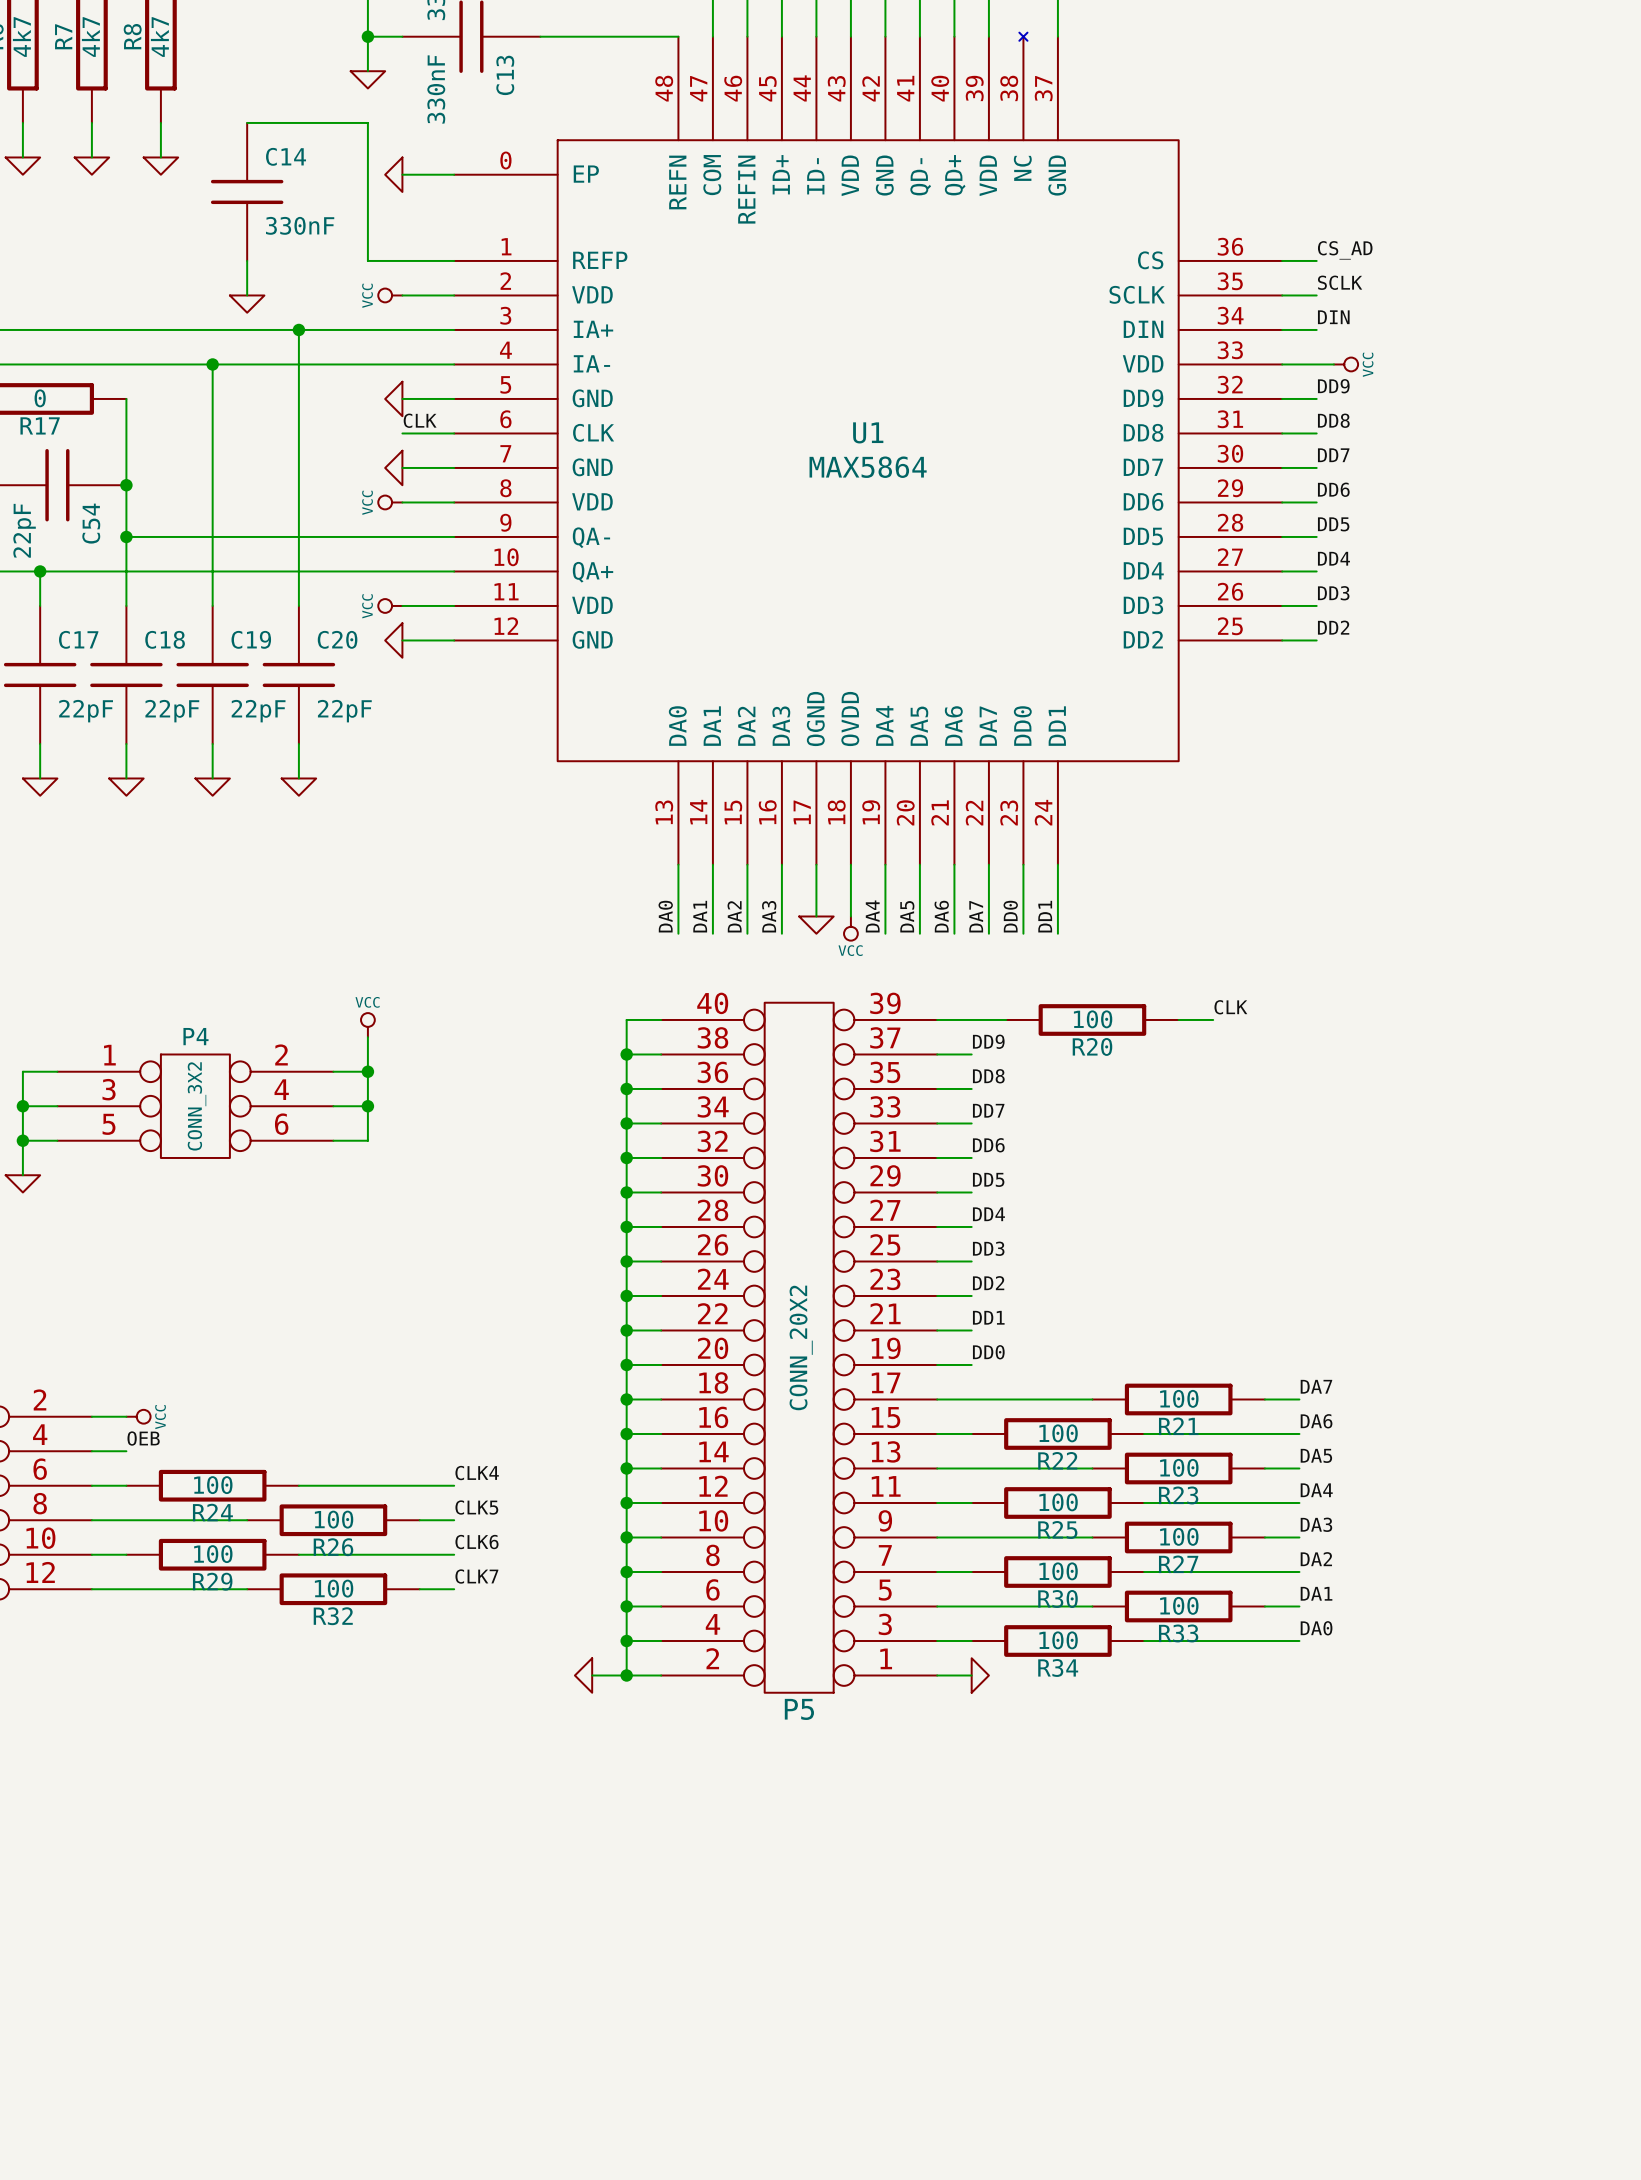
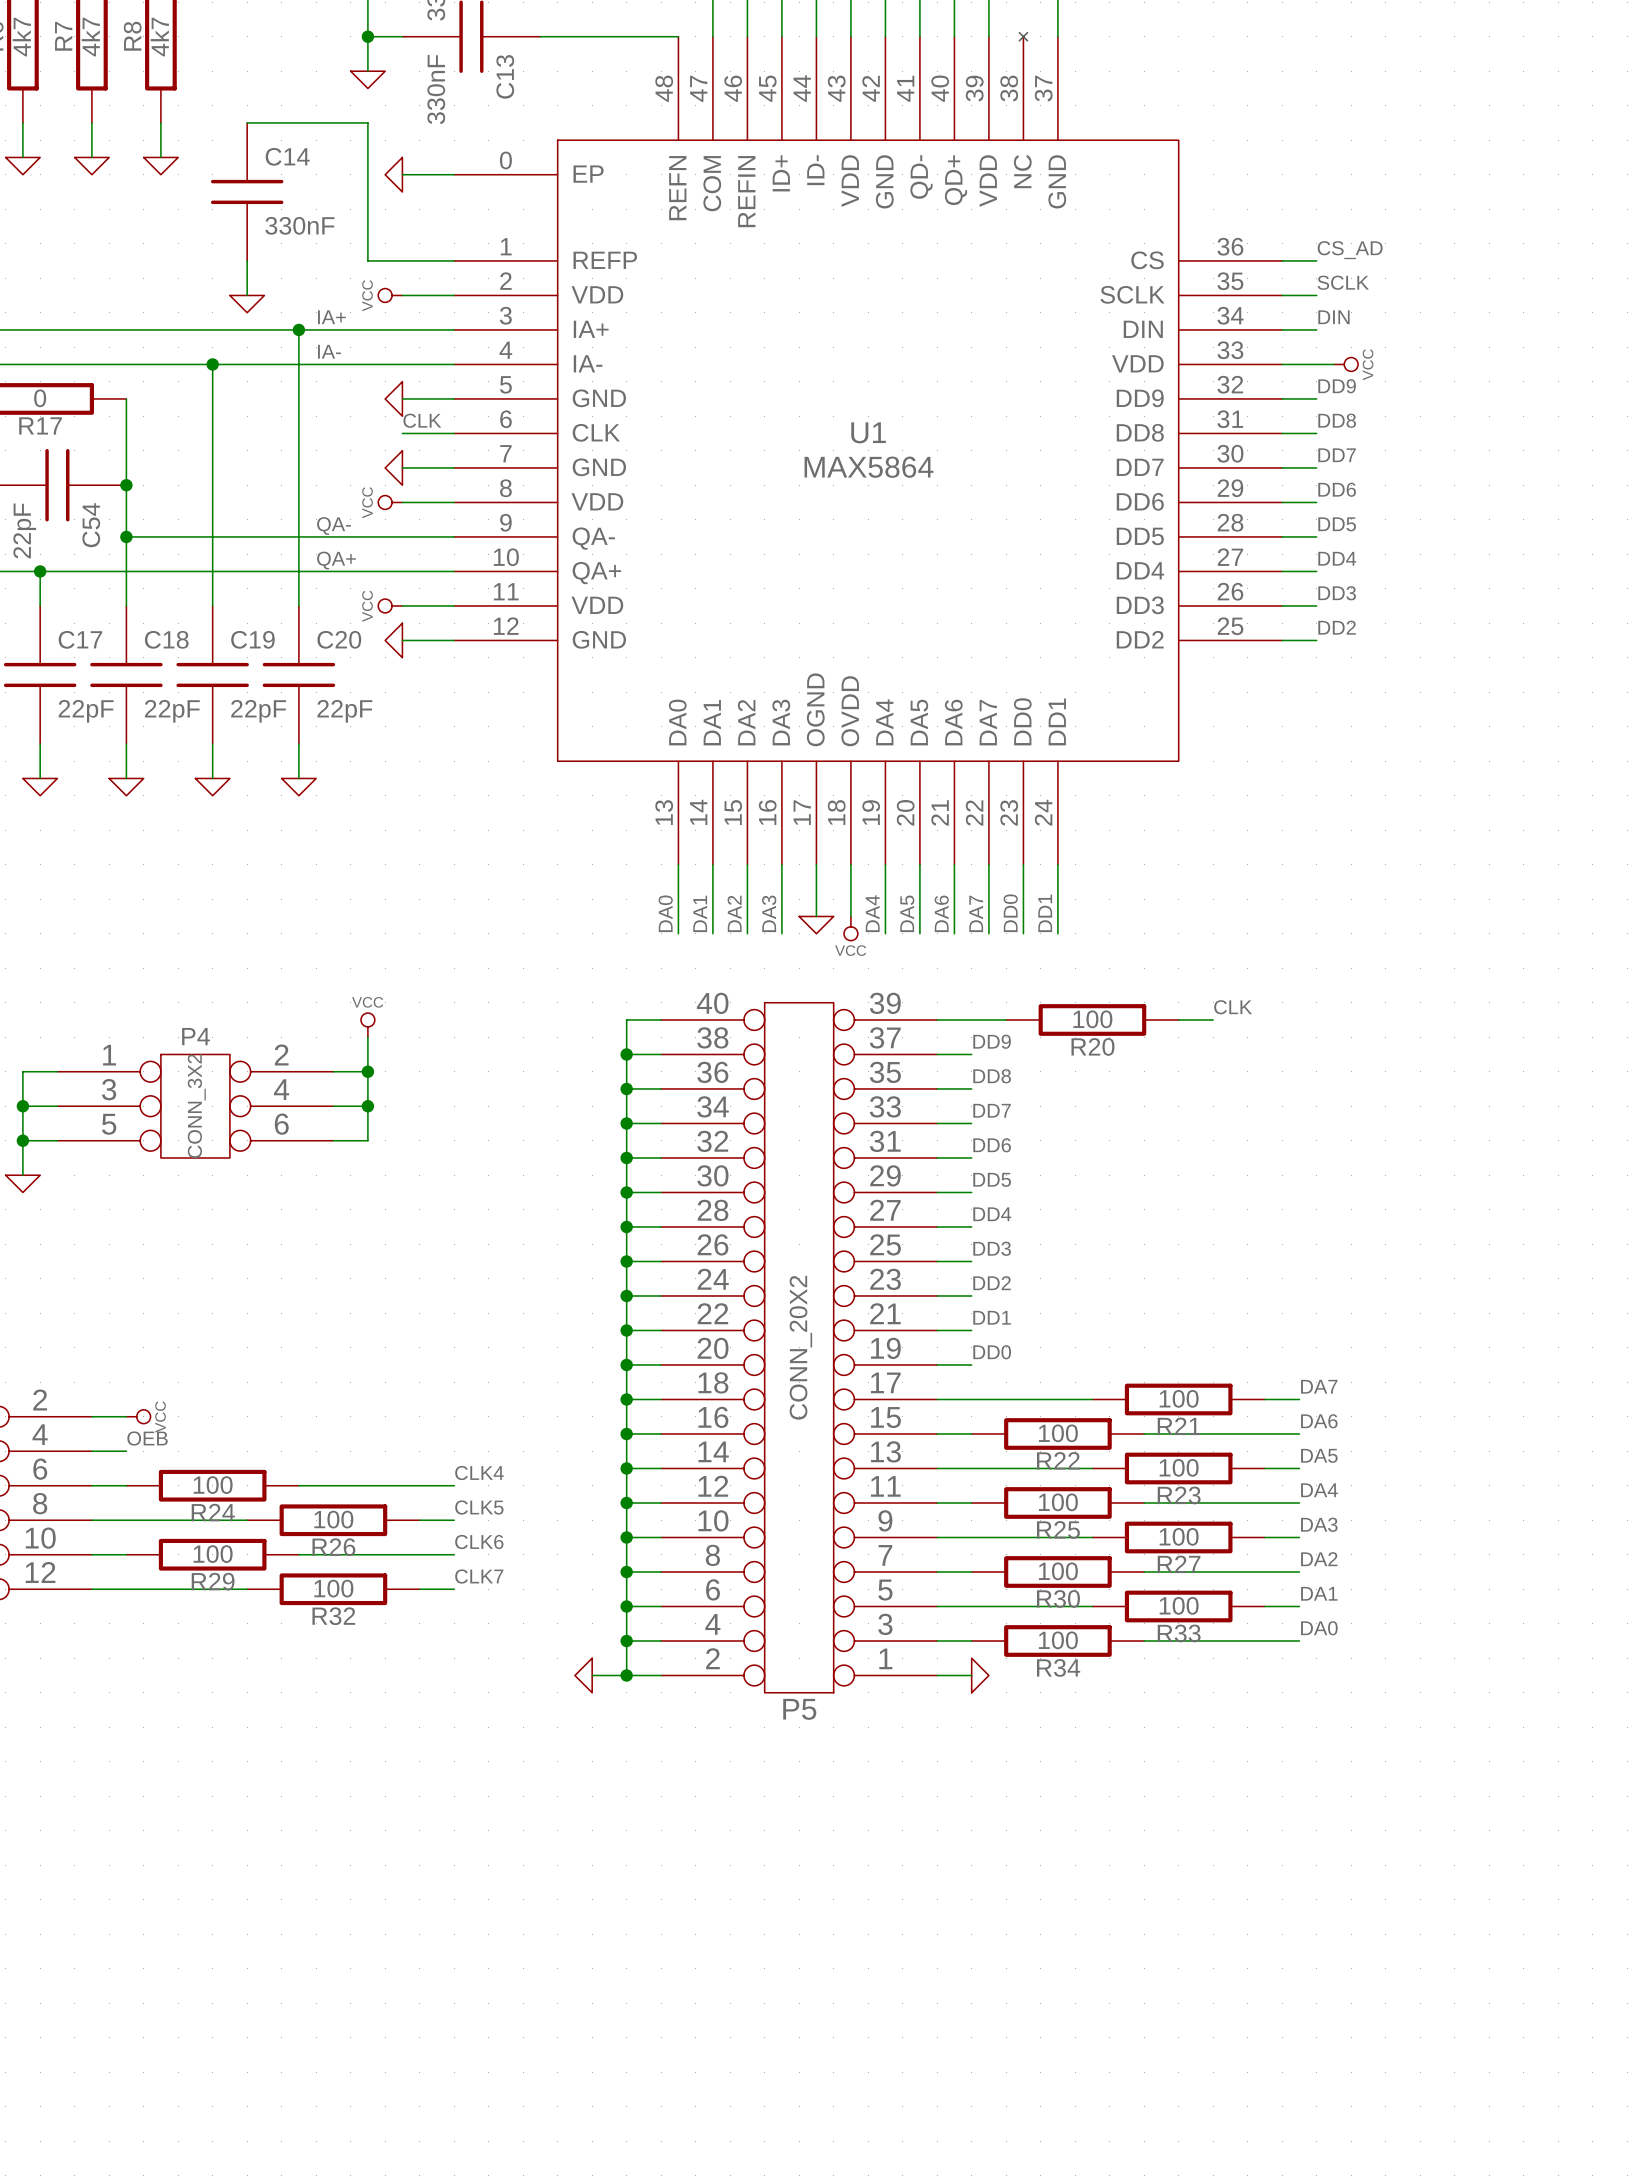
label: none -> IA+ (331, 317)
label: none -> IA- (329, 351)
label: none -> QA- (334, 526)
label: none -> QA+ (336, 560)

